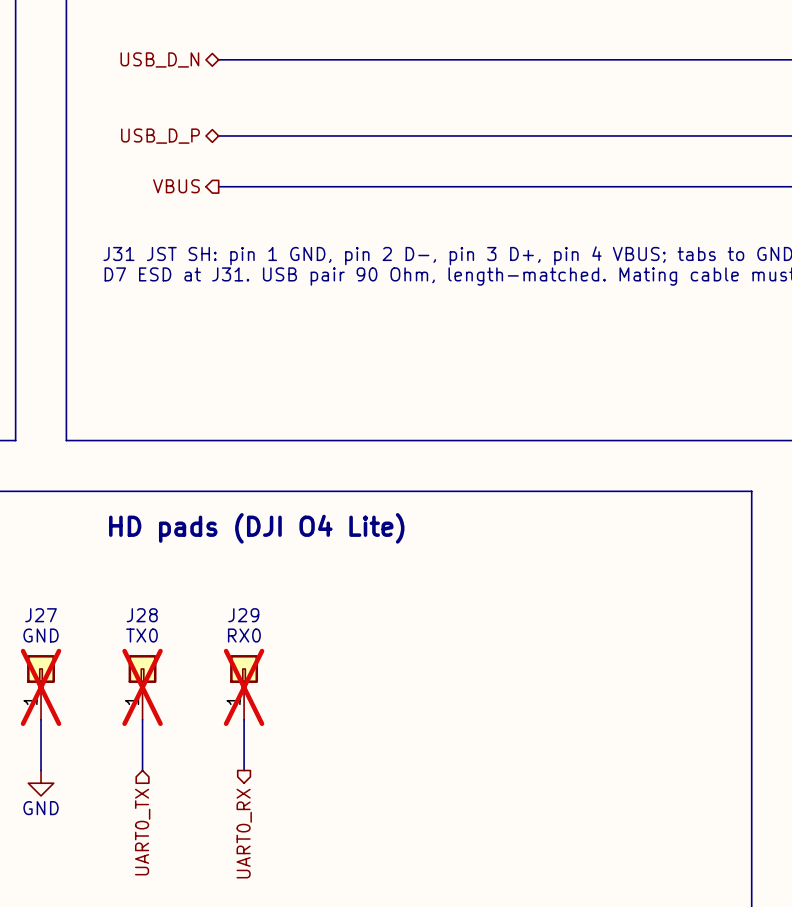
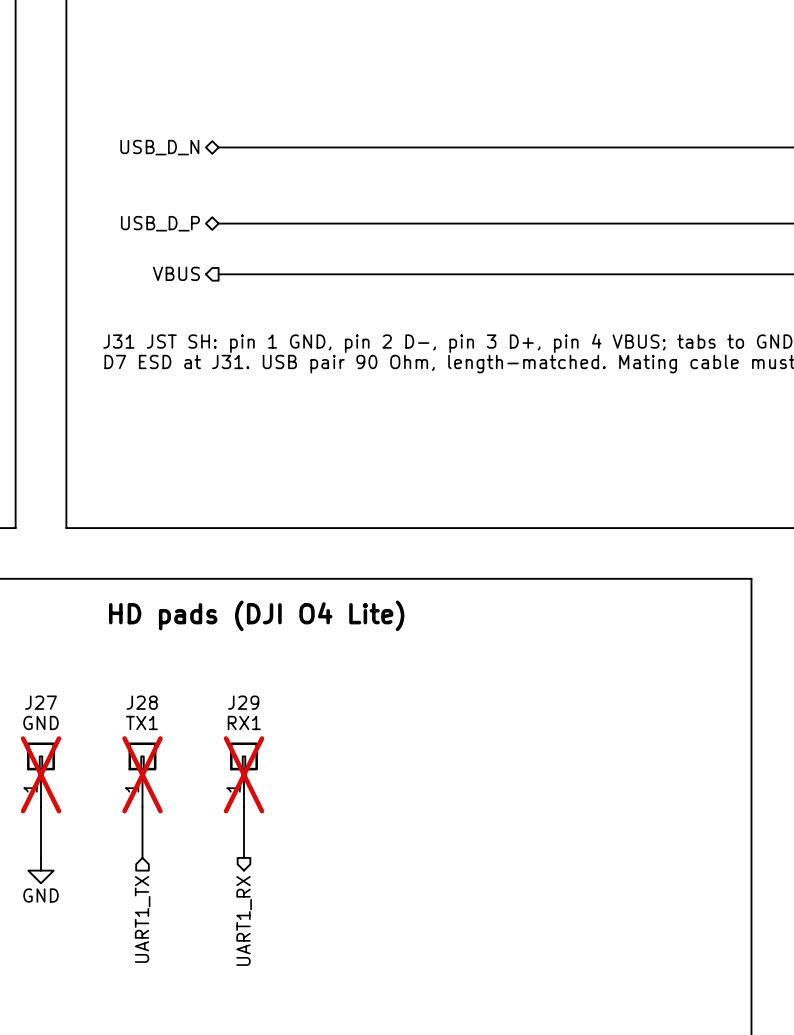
J28 value: TX0 (141, 635) -> TX1 (141, 722)
J29 value: RX0 (244, 635) -> RX1 (244, 722)
hierarchical label: UART0_TX (142, 832) -> UART1_TX (142, 919)
hierarchical label: UART0_RX (244, 833) -> UART1_RX (244, 920)

